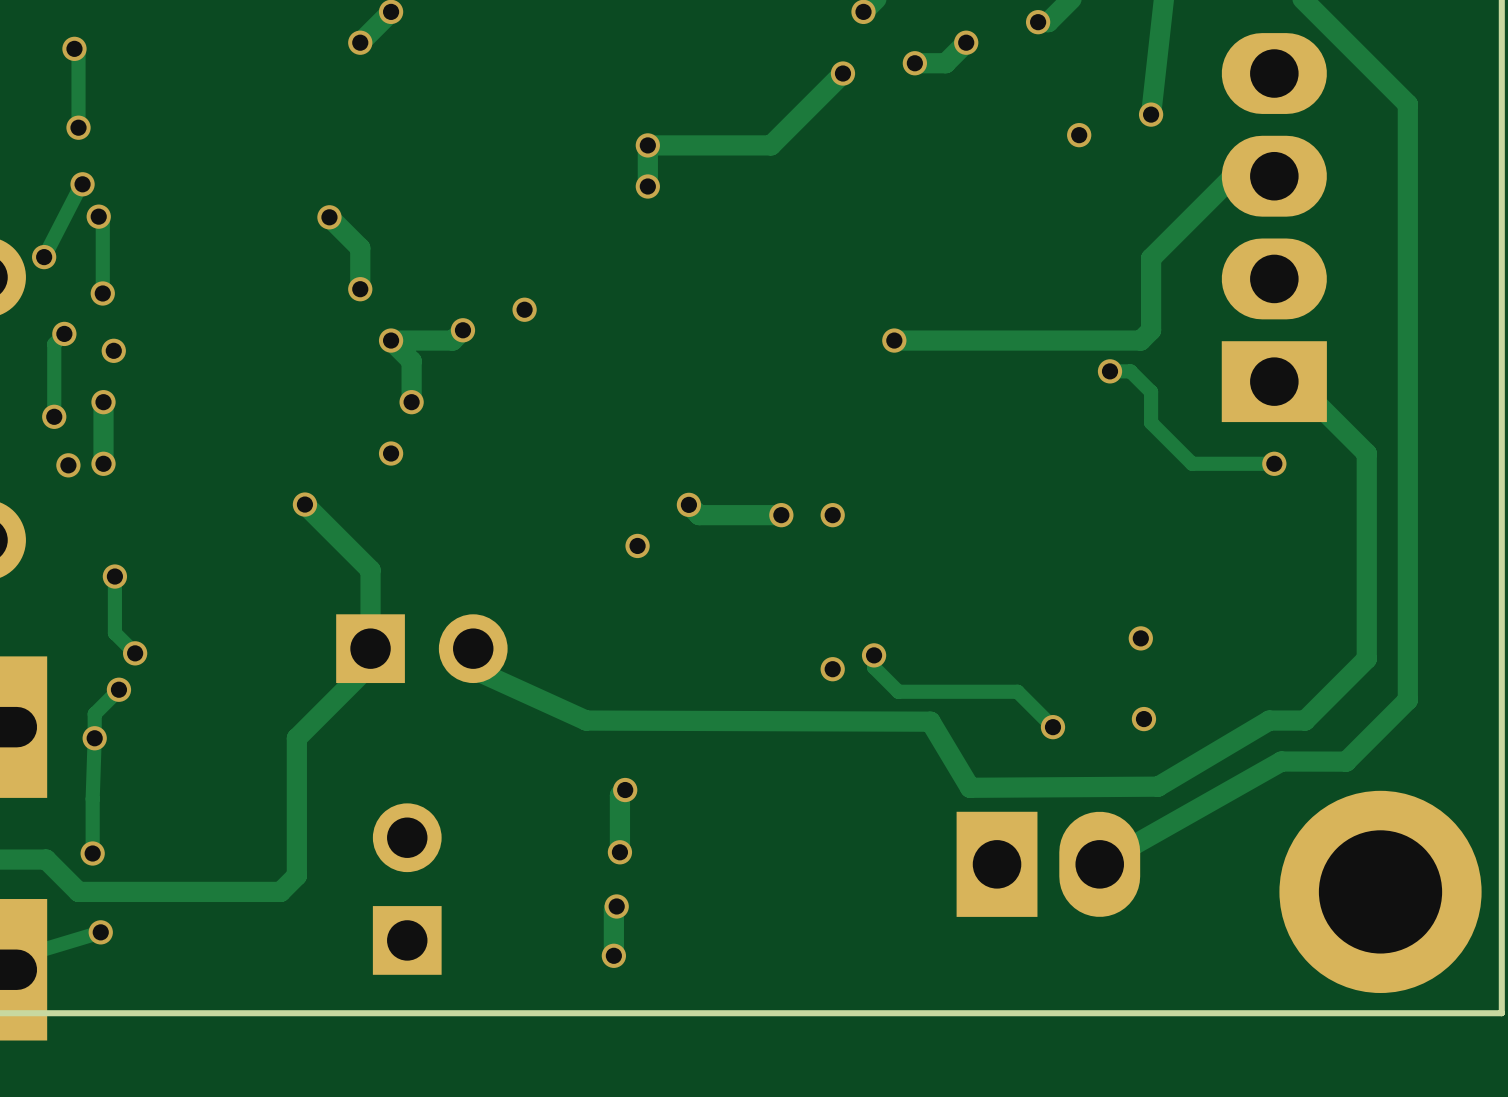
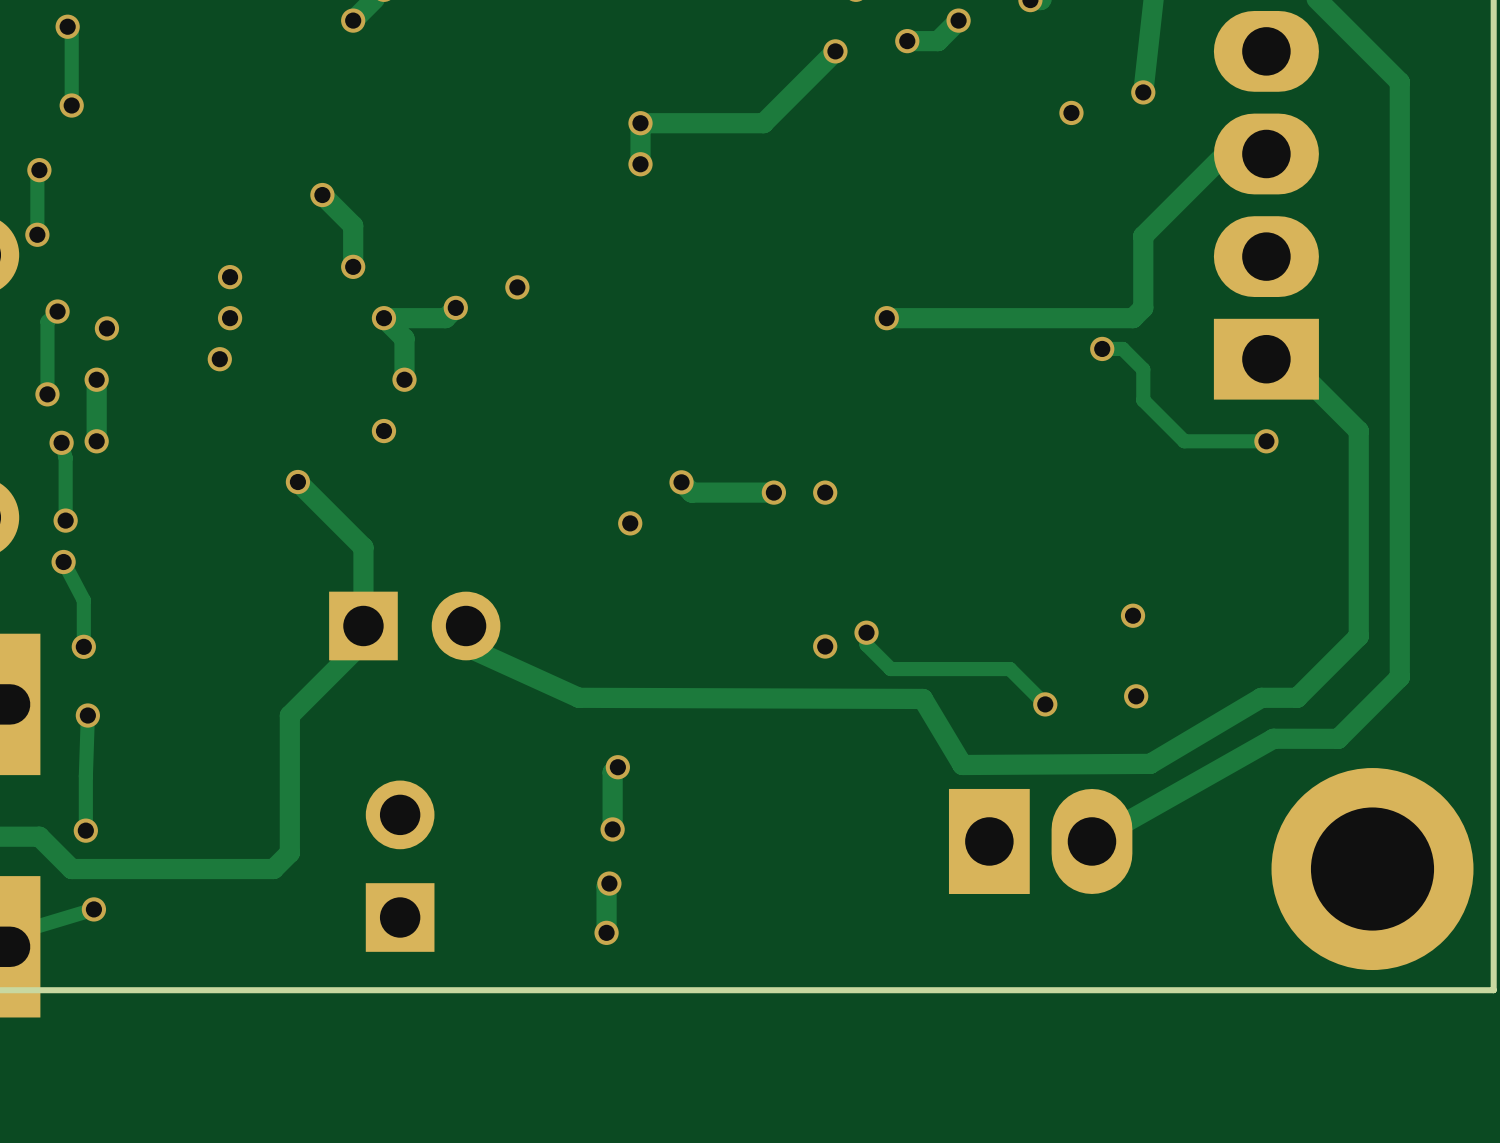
track: (82, 184) (44, 257) -> (39, 170) (37, 172) (37, 234)
via: (82, 184) -> none
via: none -> (39, 170)
track: (98, 216) (102, 220) (102, 293) -> none
via: (98, 216) -> none
via: (102, 293) -> none
via: none -> (230, 277)
via: none -> (230, 318)
via: none -> (219, 359)
track: none -> (61, 442) (65, 457) (65, 520)
via: none -> (65, 520)
track: (114, 576) (114, 633) (135, 653) -> none
via: (114, 576) -> none
track: none -> (63, 562) (83, 600) (83, 646)
via: none -> (63, 562)
via: (135, 653) -> none
via: none -> (83, 646)
track: (118, 689) (94, 714) (94, 738) -> none
via: (118, 689) -> none

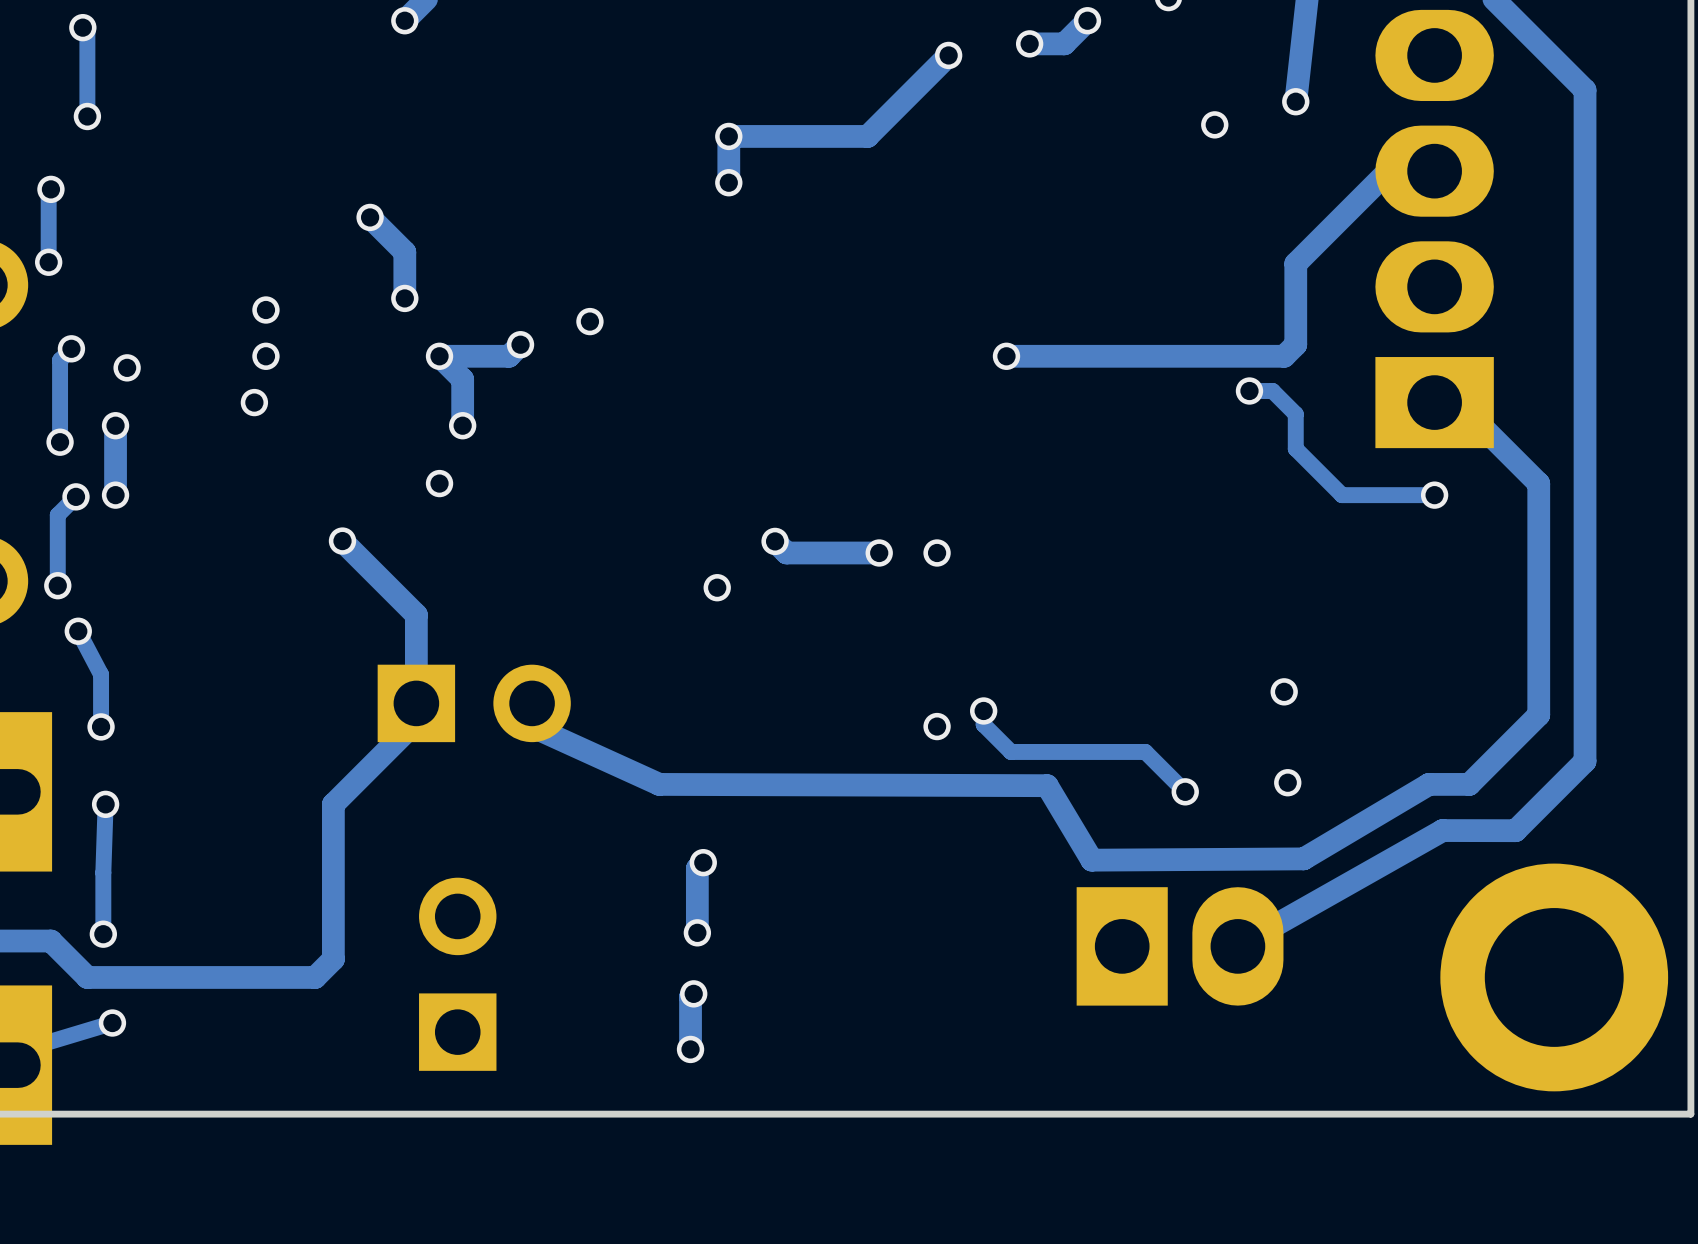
track: (61, 442) (65, 457) (65, 520) -> (76, 496) (57, 515) (57, 585)
via position: (65, 520) -> (57, 585)

